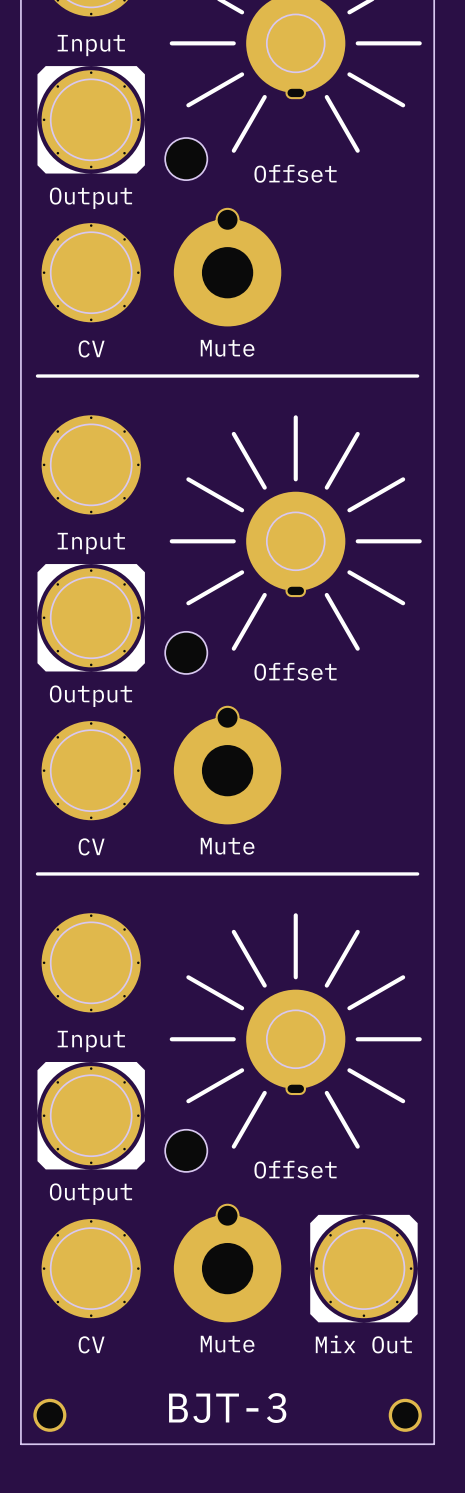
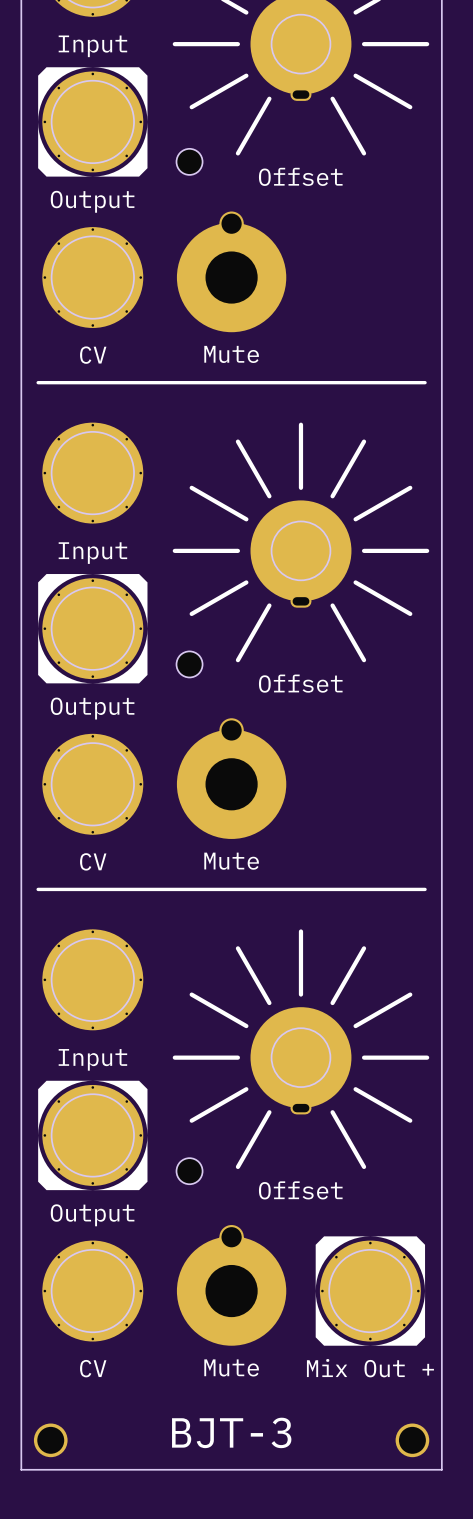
part footprint: [165, 137, 208, 181] -> [176, 148, 203, 175]
part footprint: [165, 631, 208, 674] -> [176, 651, 203, 678]
part footprint: [165, 1129, 208, 1172] -> [176, 1158, 203, 1185]
part value: Mix Out (363, 1344) -> Mix Out + (370, 1368)

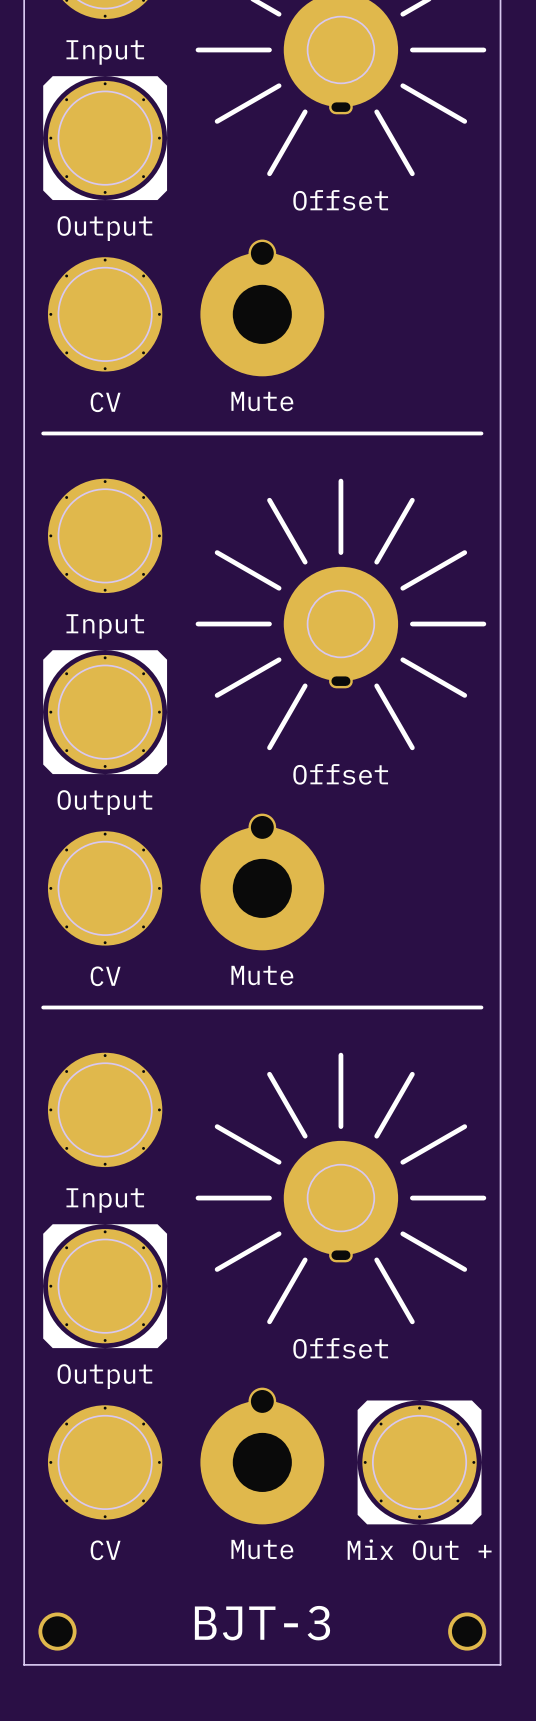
part: (189, 161) -> none
part: (189, 664) -> none
part: (189, 1171) -> none

